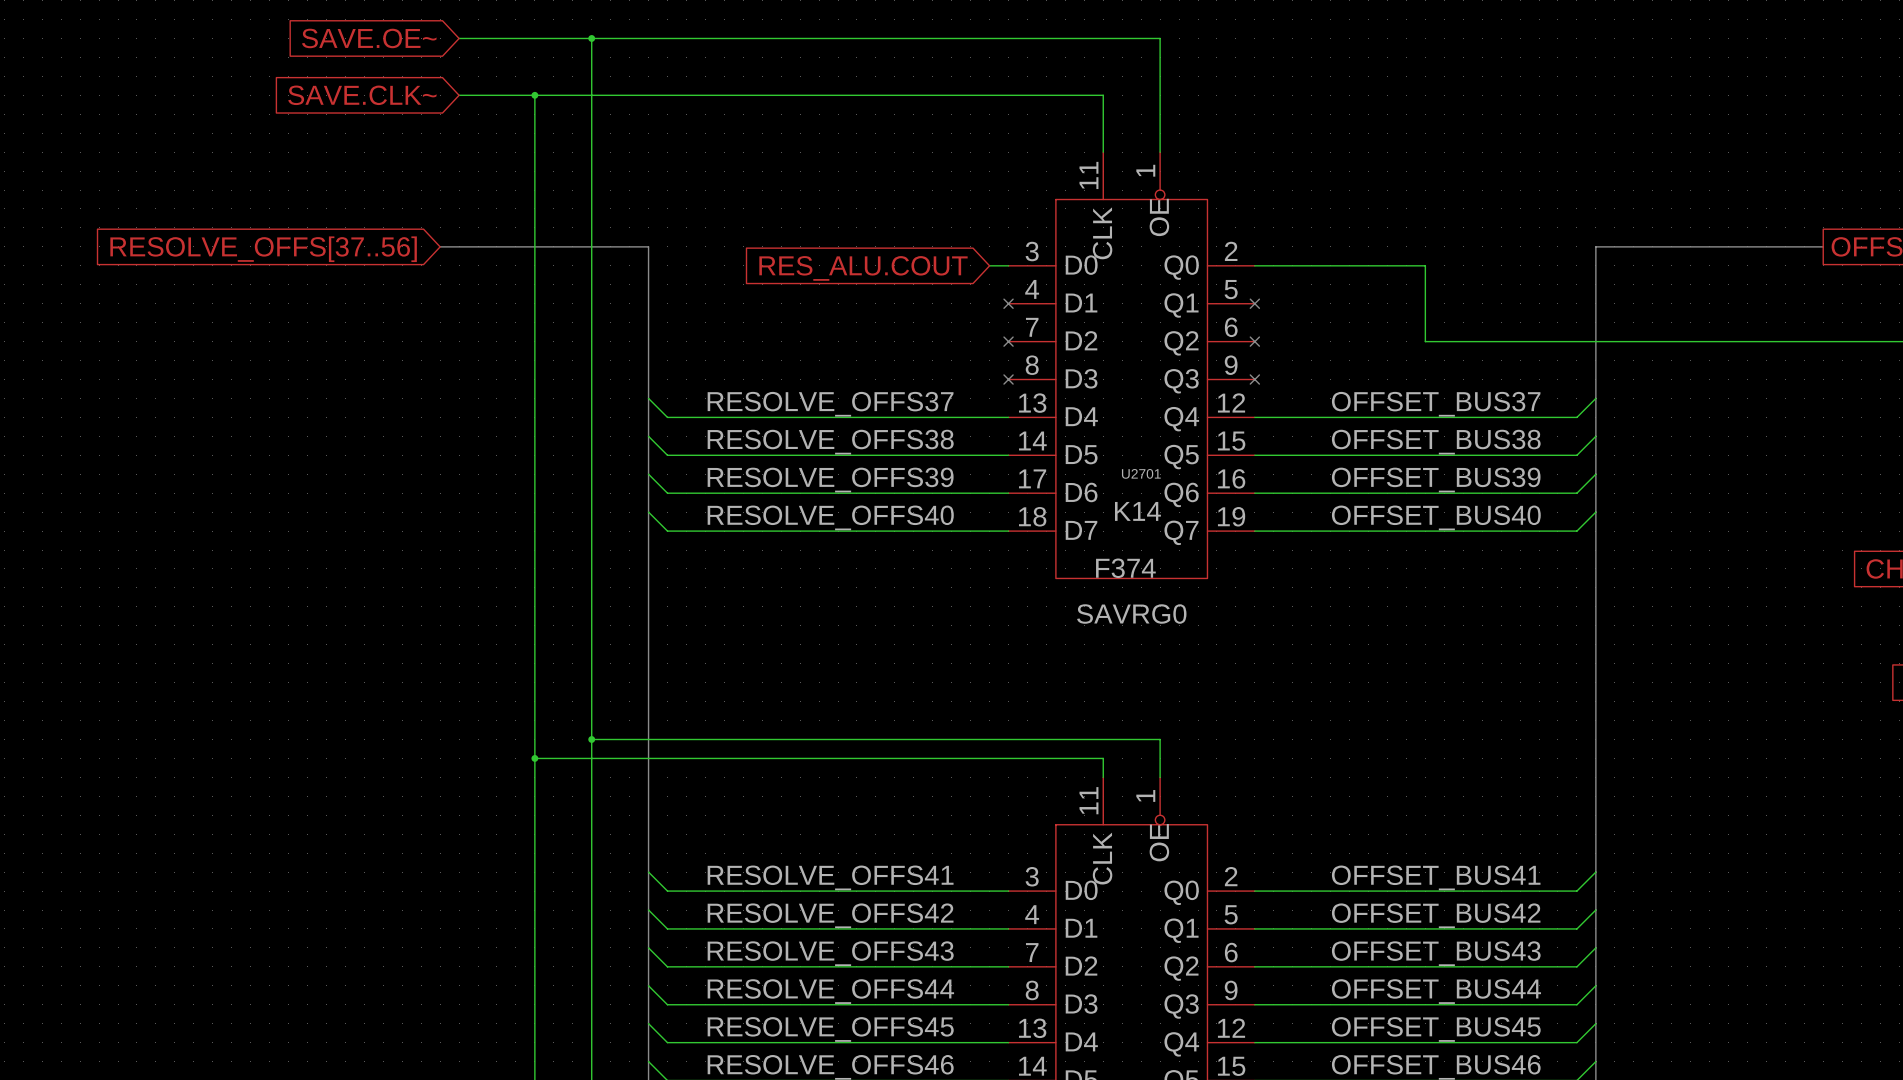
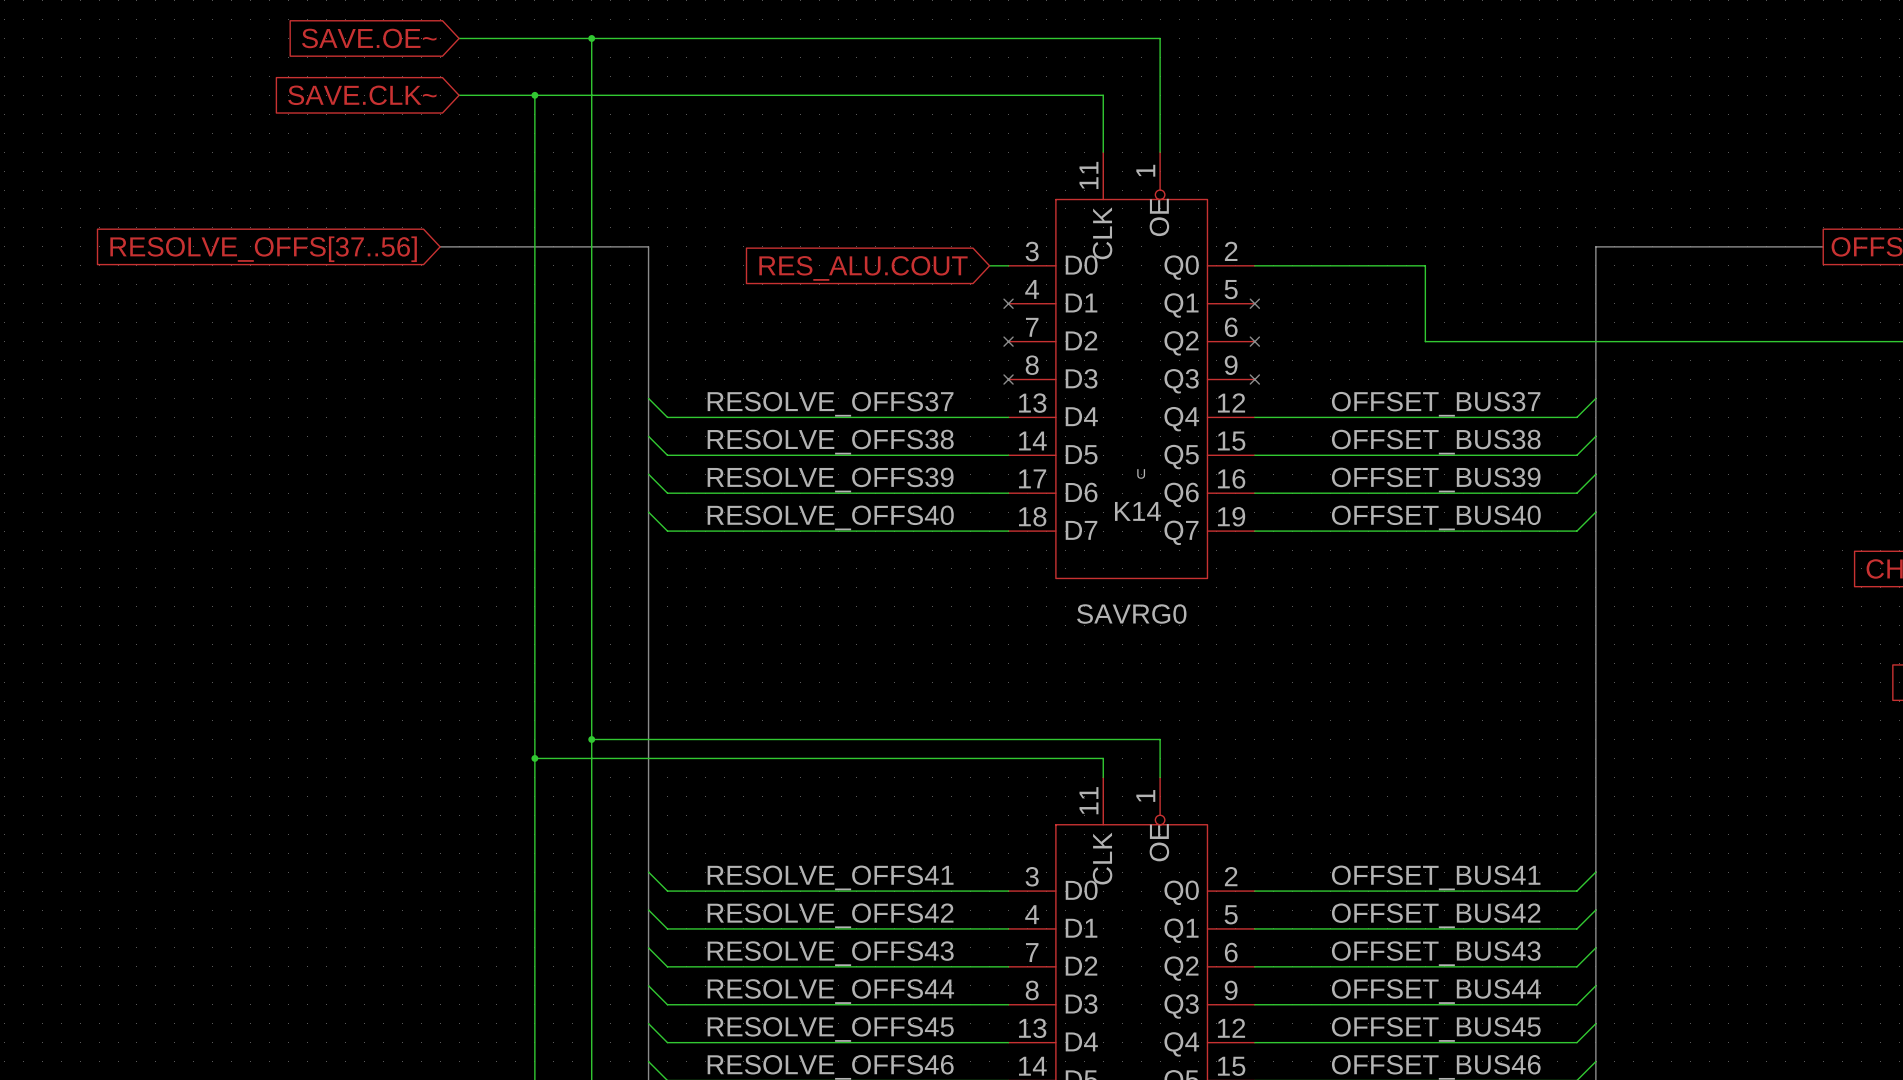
U2701 name: U2701 (1141, 473) -> U (1141, 473)
U2701 value: F374 (1125, 568) -> none

